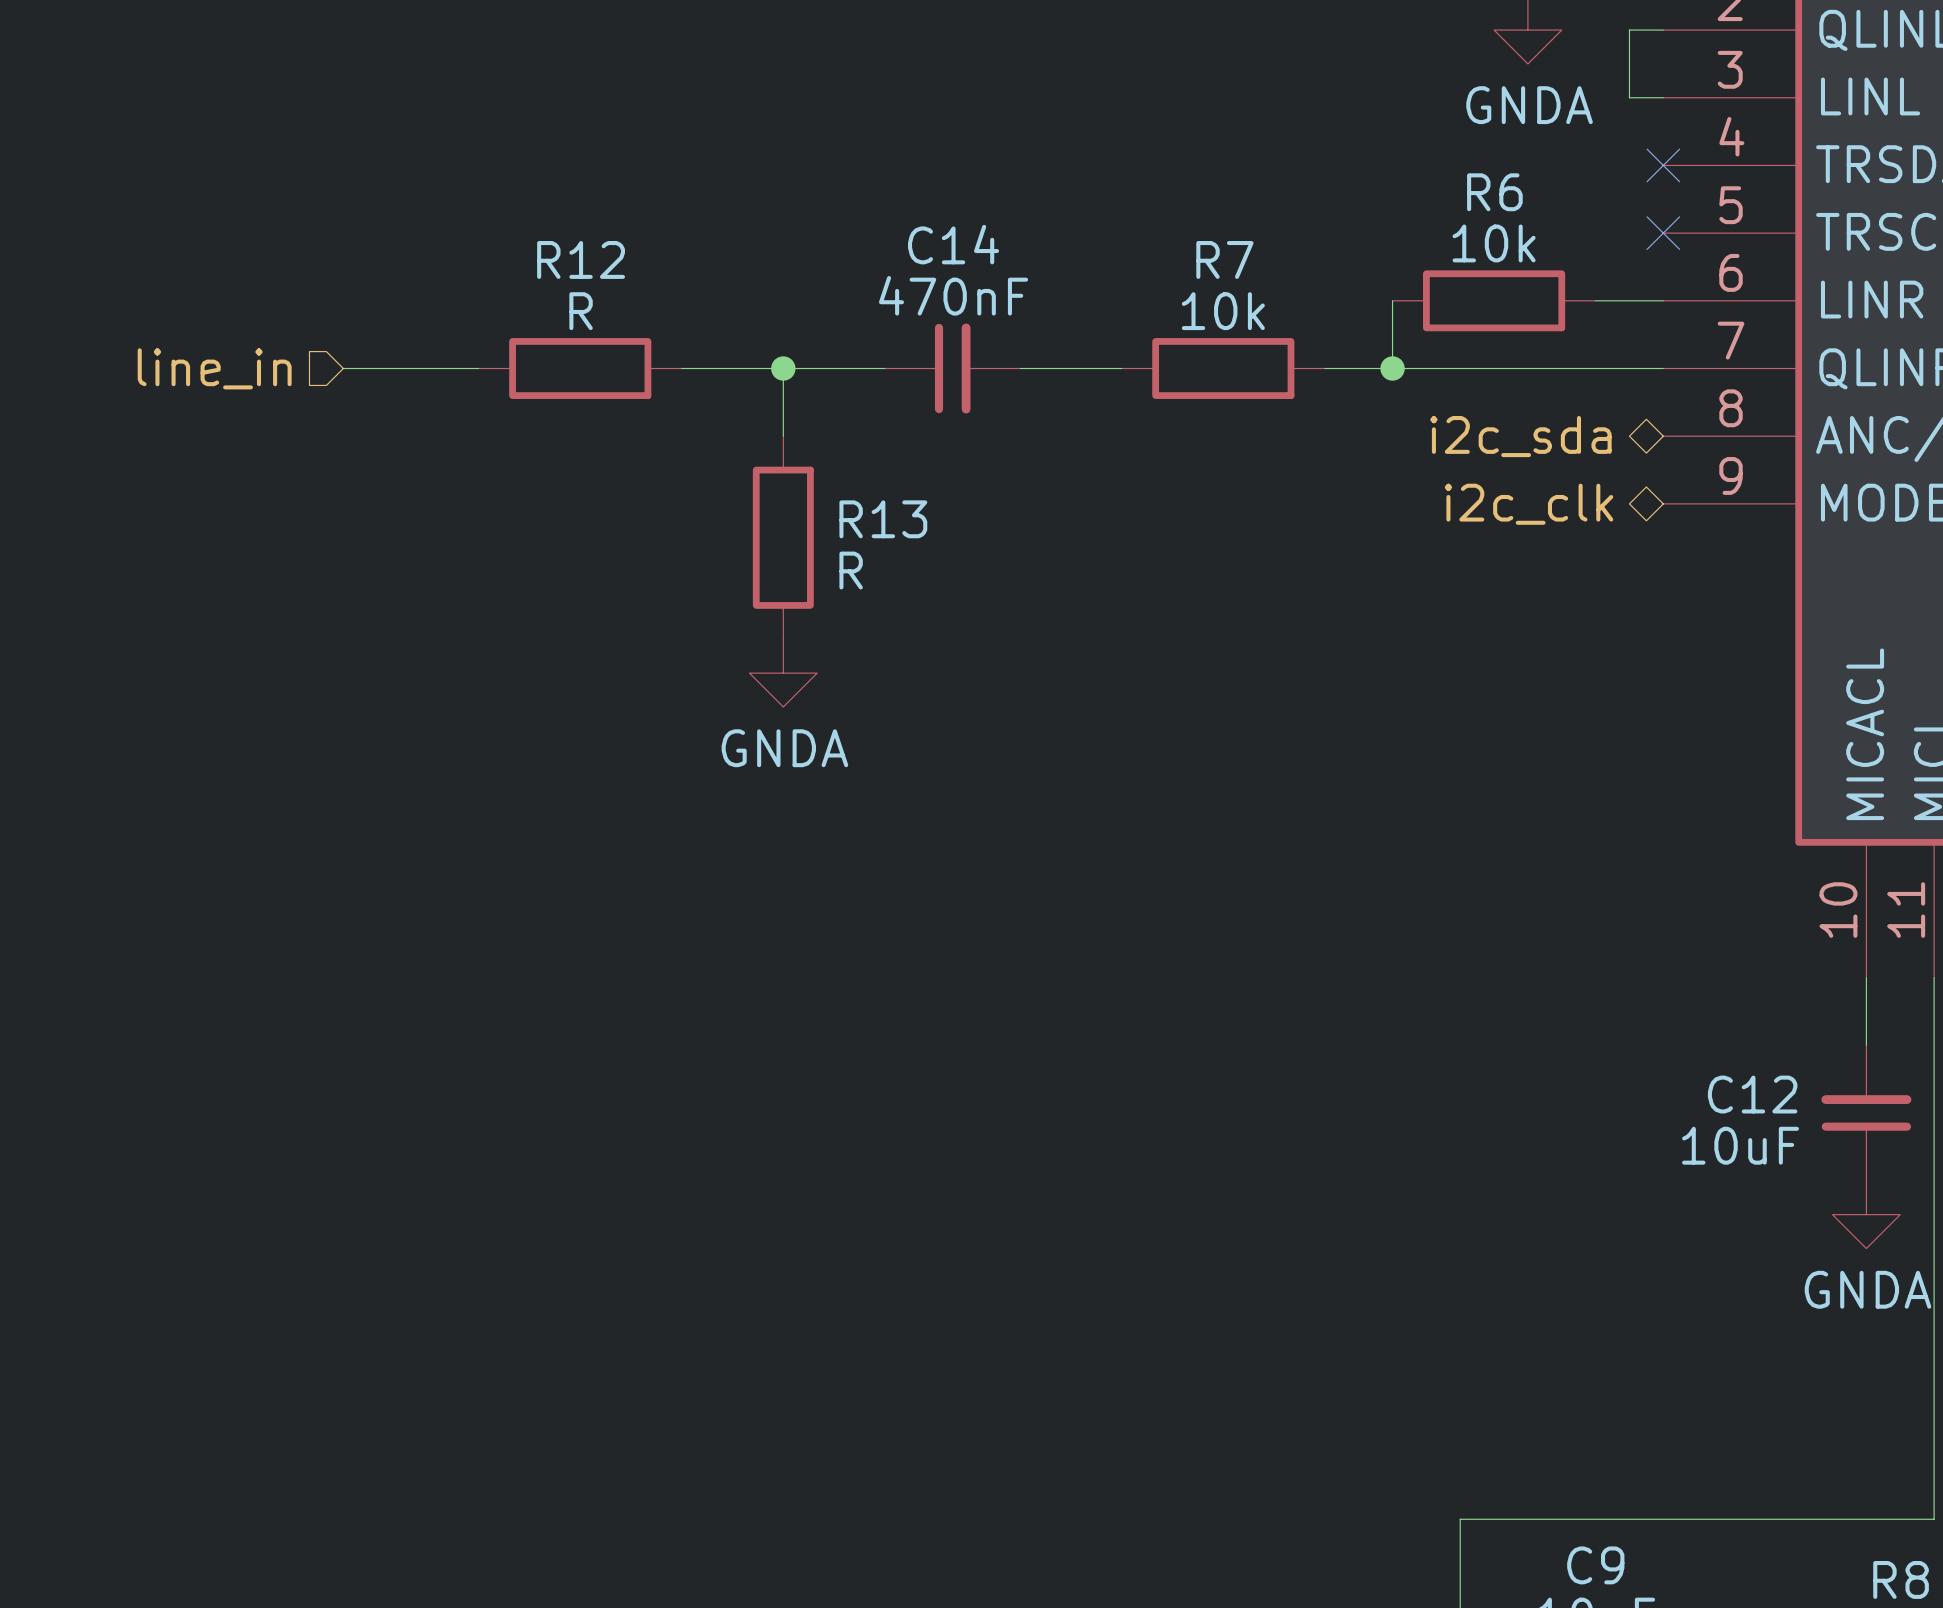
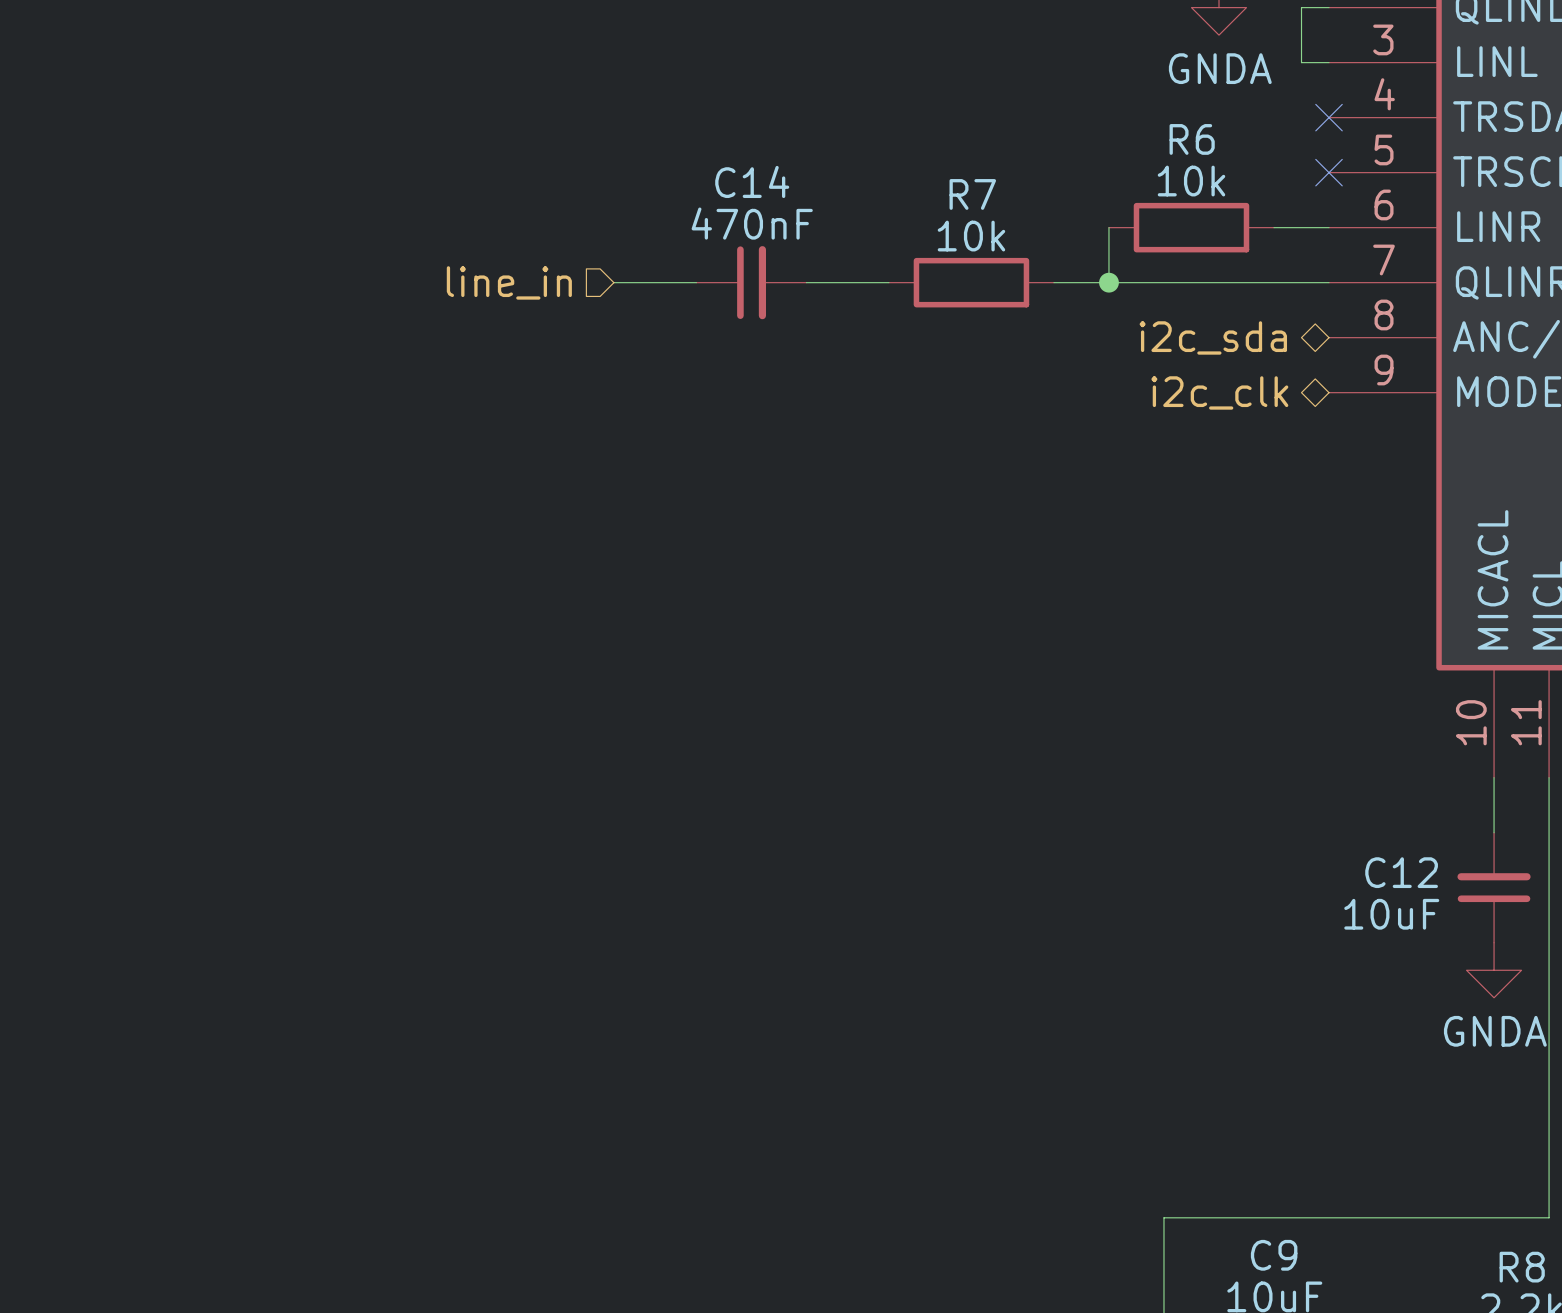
hierarchical label position: line_in (214, 368) -> line_in (509, 282)
wire: (343, 368) (478, 368) -> none
R12: R (580, 368) -> none
wire: (681, 368) (783, 368) (783, 436) -> none
junction: (783, 368) -> none
R13: R (783, 537) -> none
power symbol: GNDA (783, 673) -> none

